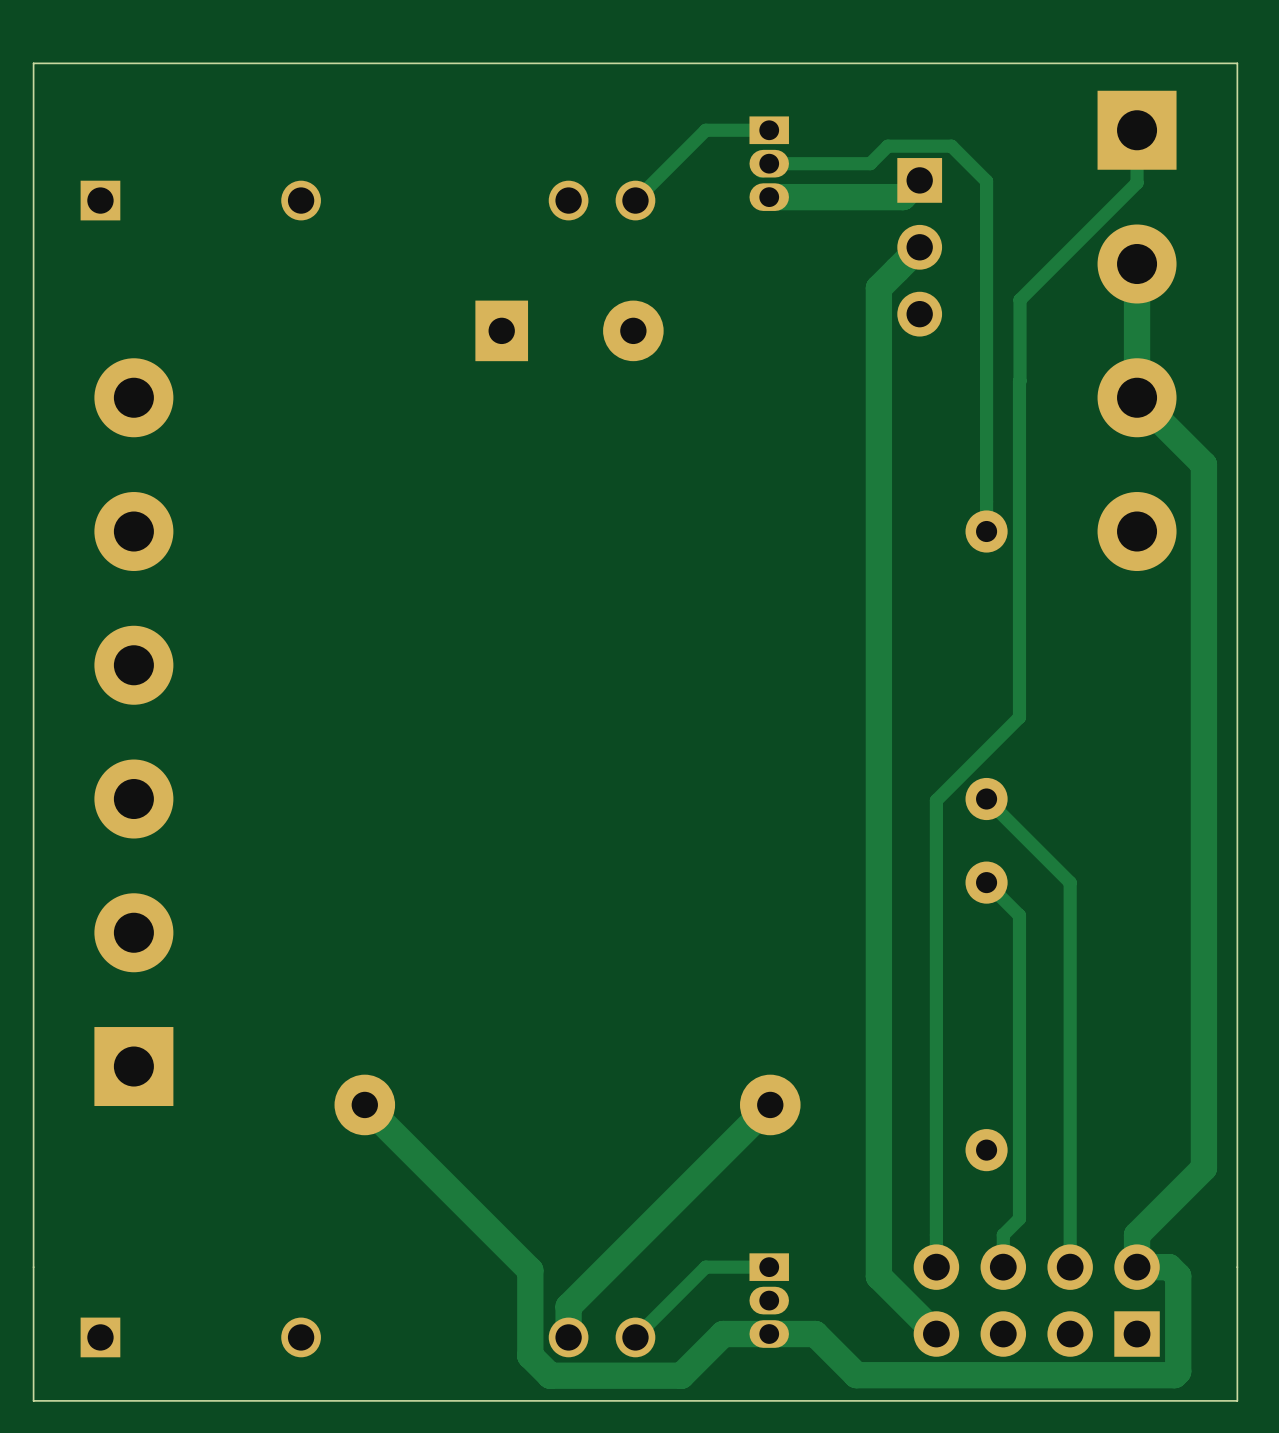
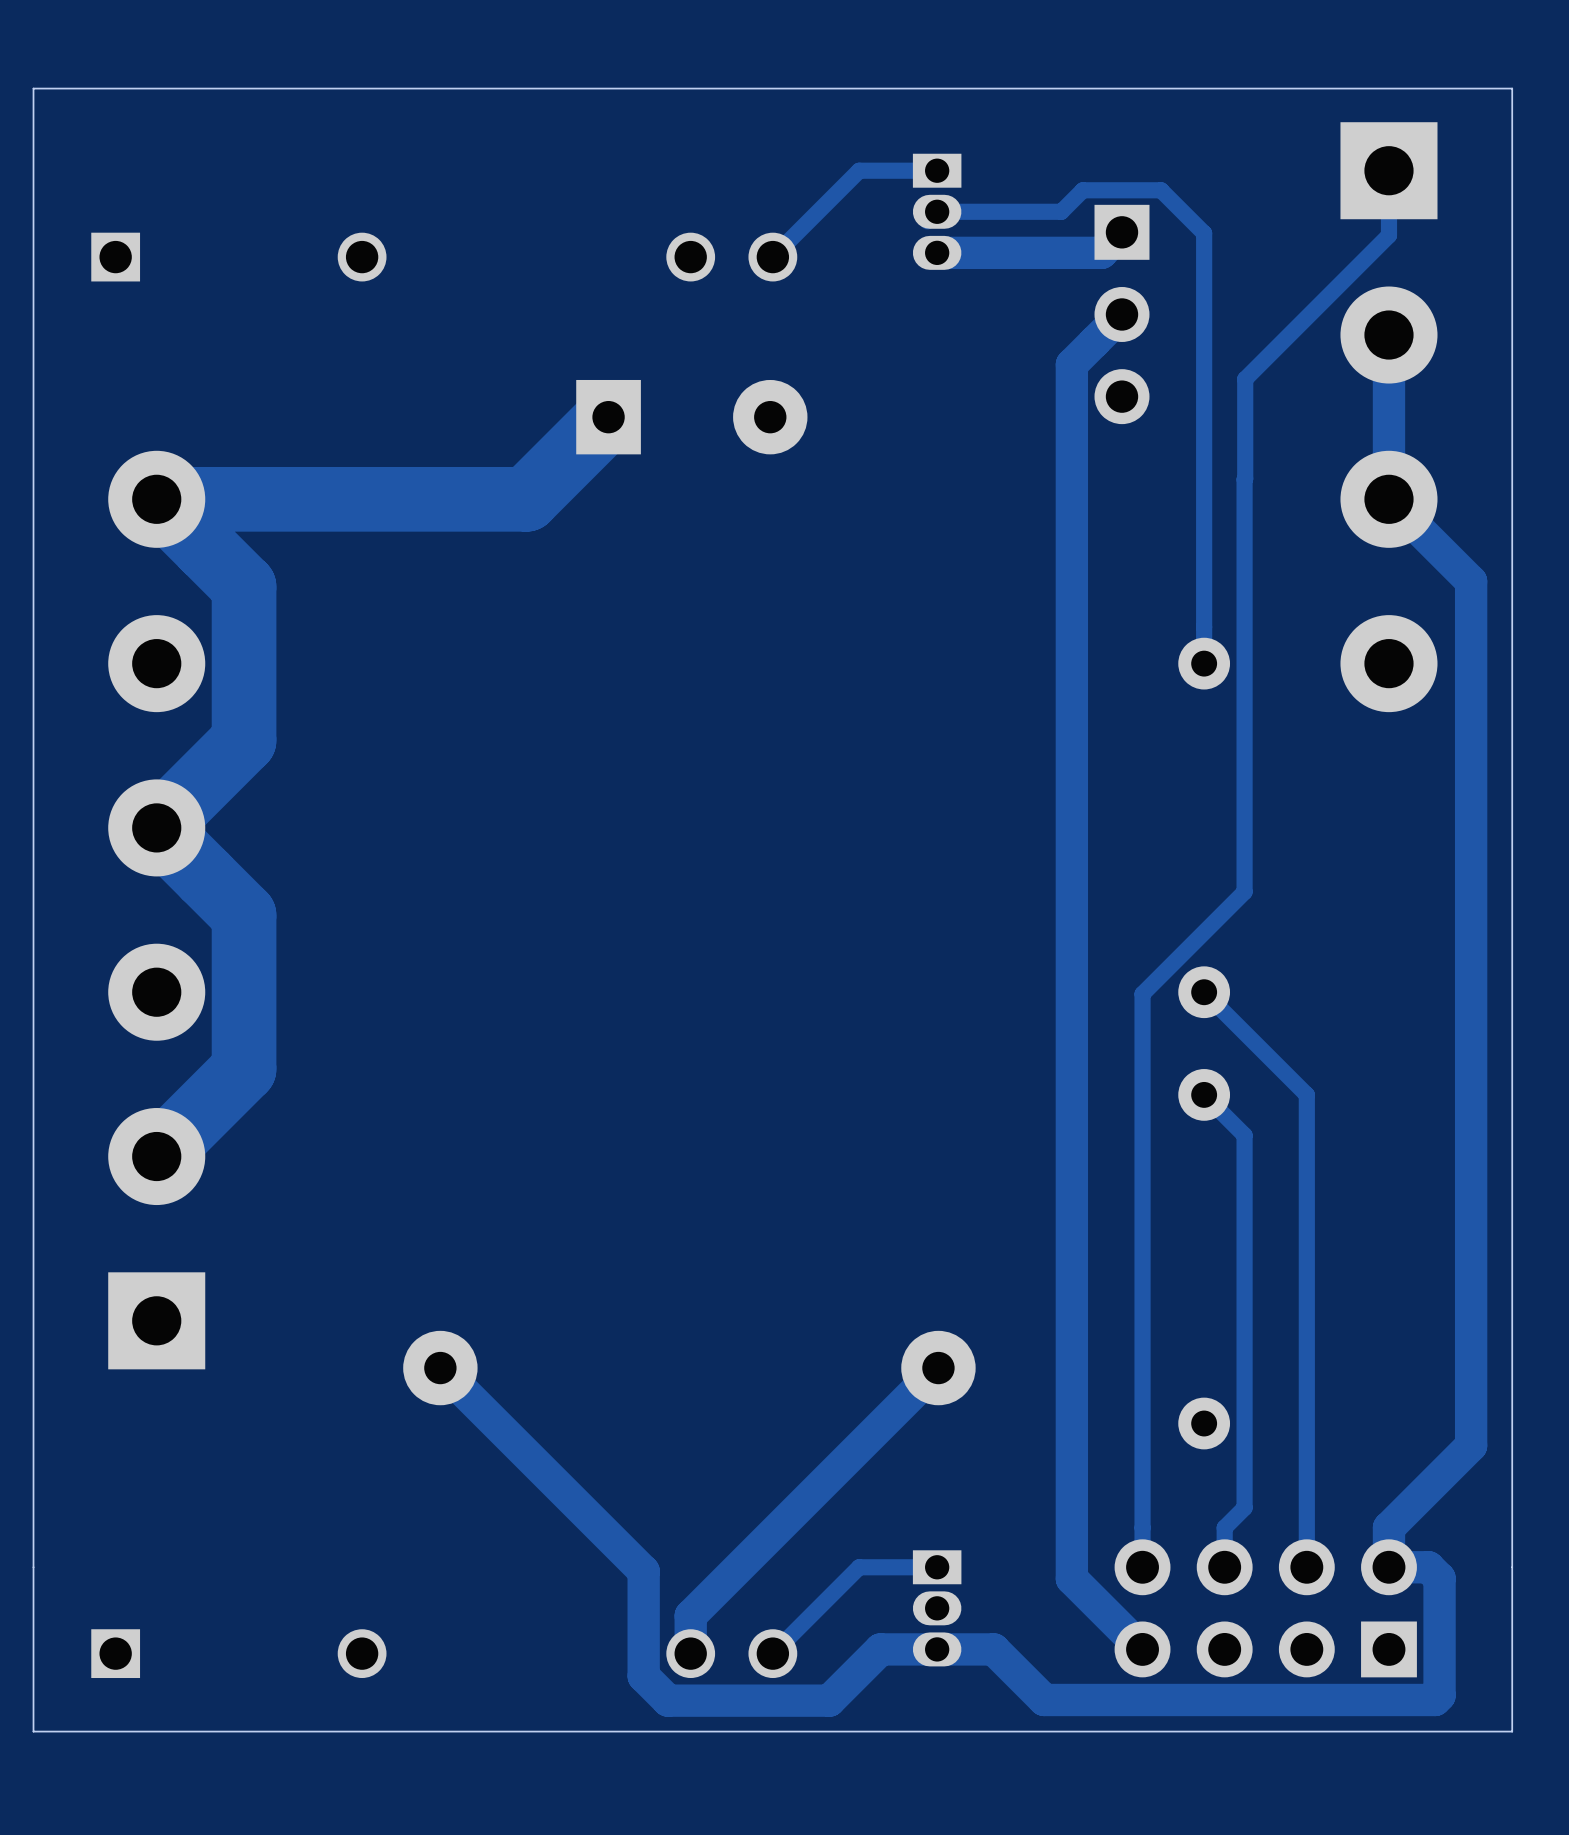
track: none -> (608, 417) (526, 499) (156, 499) (244, 586) (244, 740) (156, 827) (244, 915) (244, 1069) (156, 1156)

